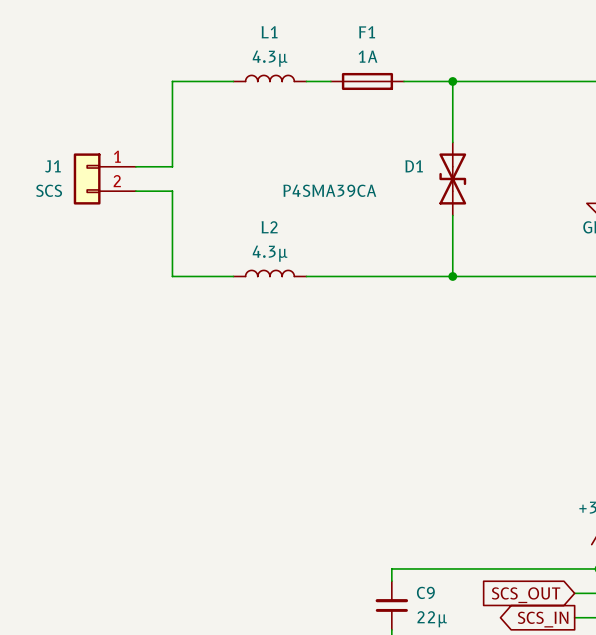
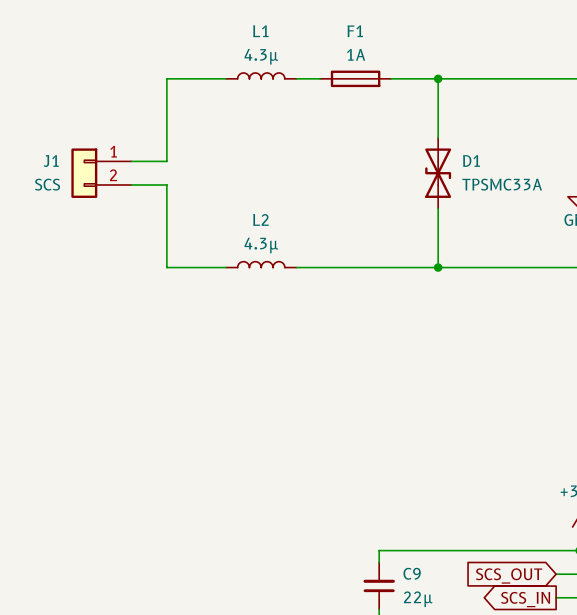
D1 name position: D1 (414, 166) -> D1 (471, 160)
D1 value: P4SMA39CA (329, 190) -> TPSMC33A (502, 184)

